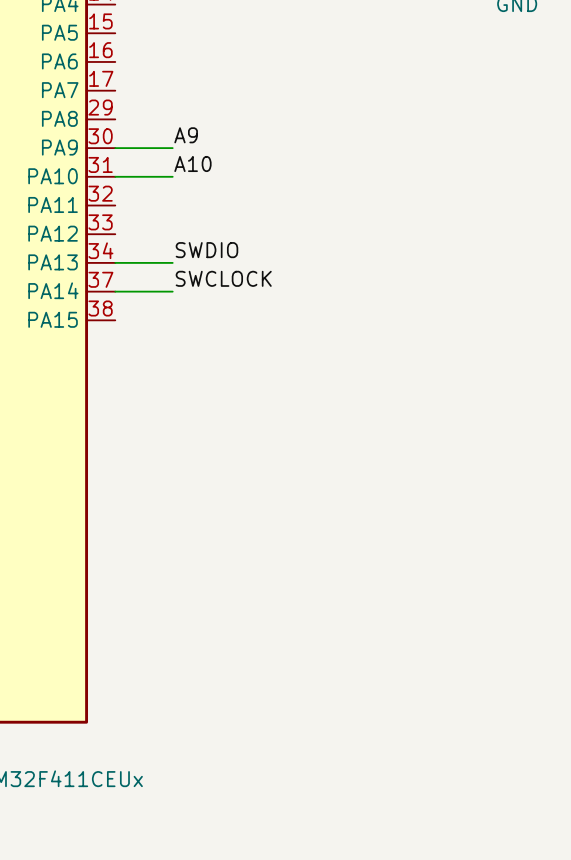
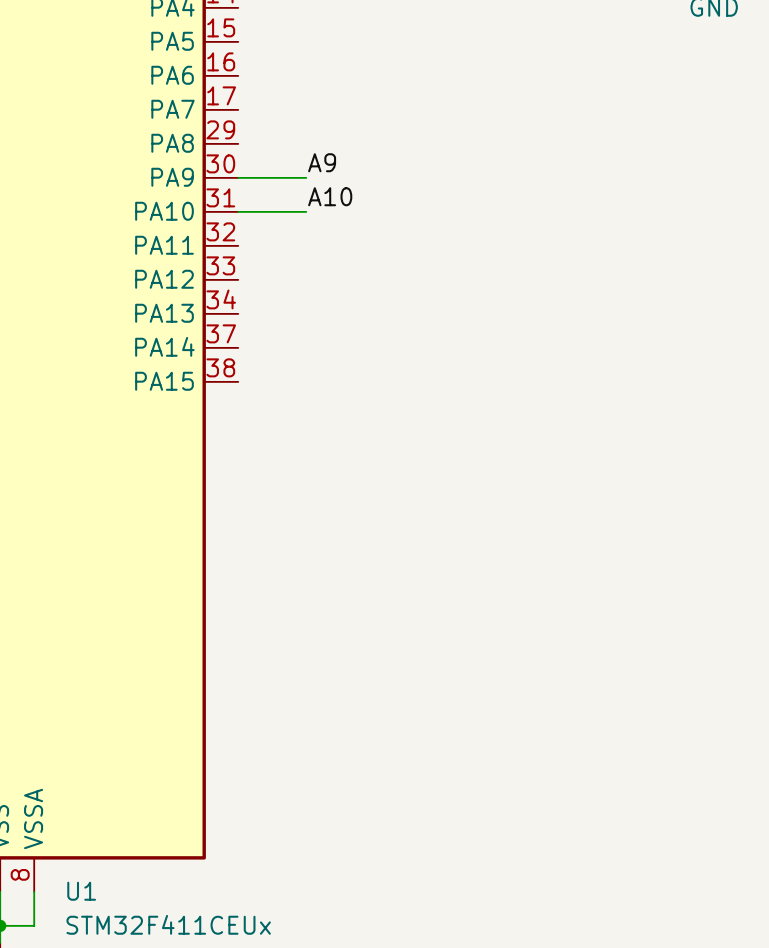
label: SWDIO (206, 250) -> none
wire: (115, 262) (172, 262) -> none
label: SWCLOCK (223, 278) -> none
wire: (115, 291) (172, 291) -> none

